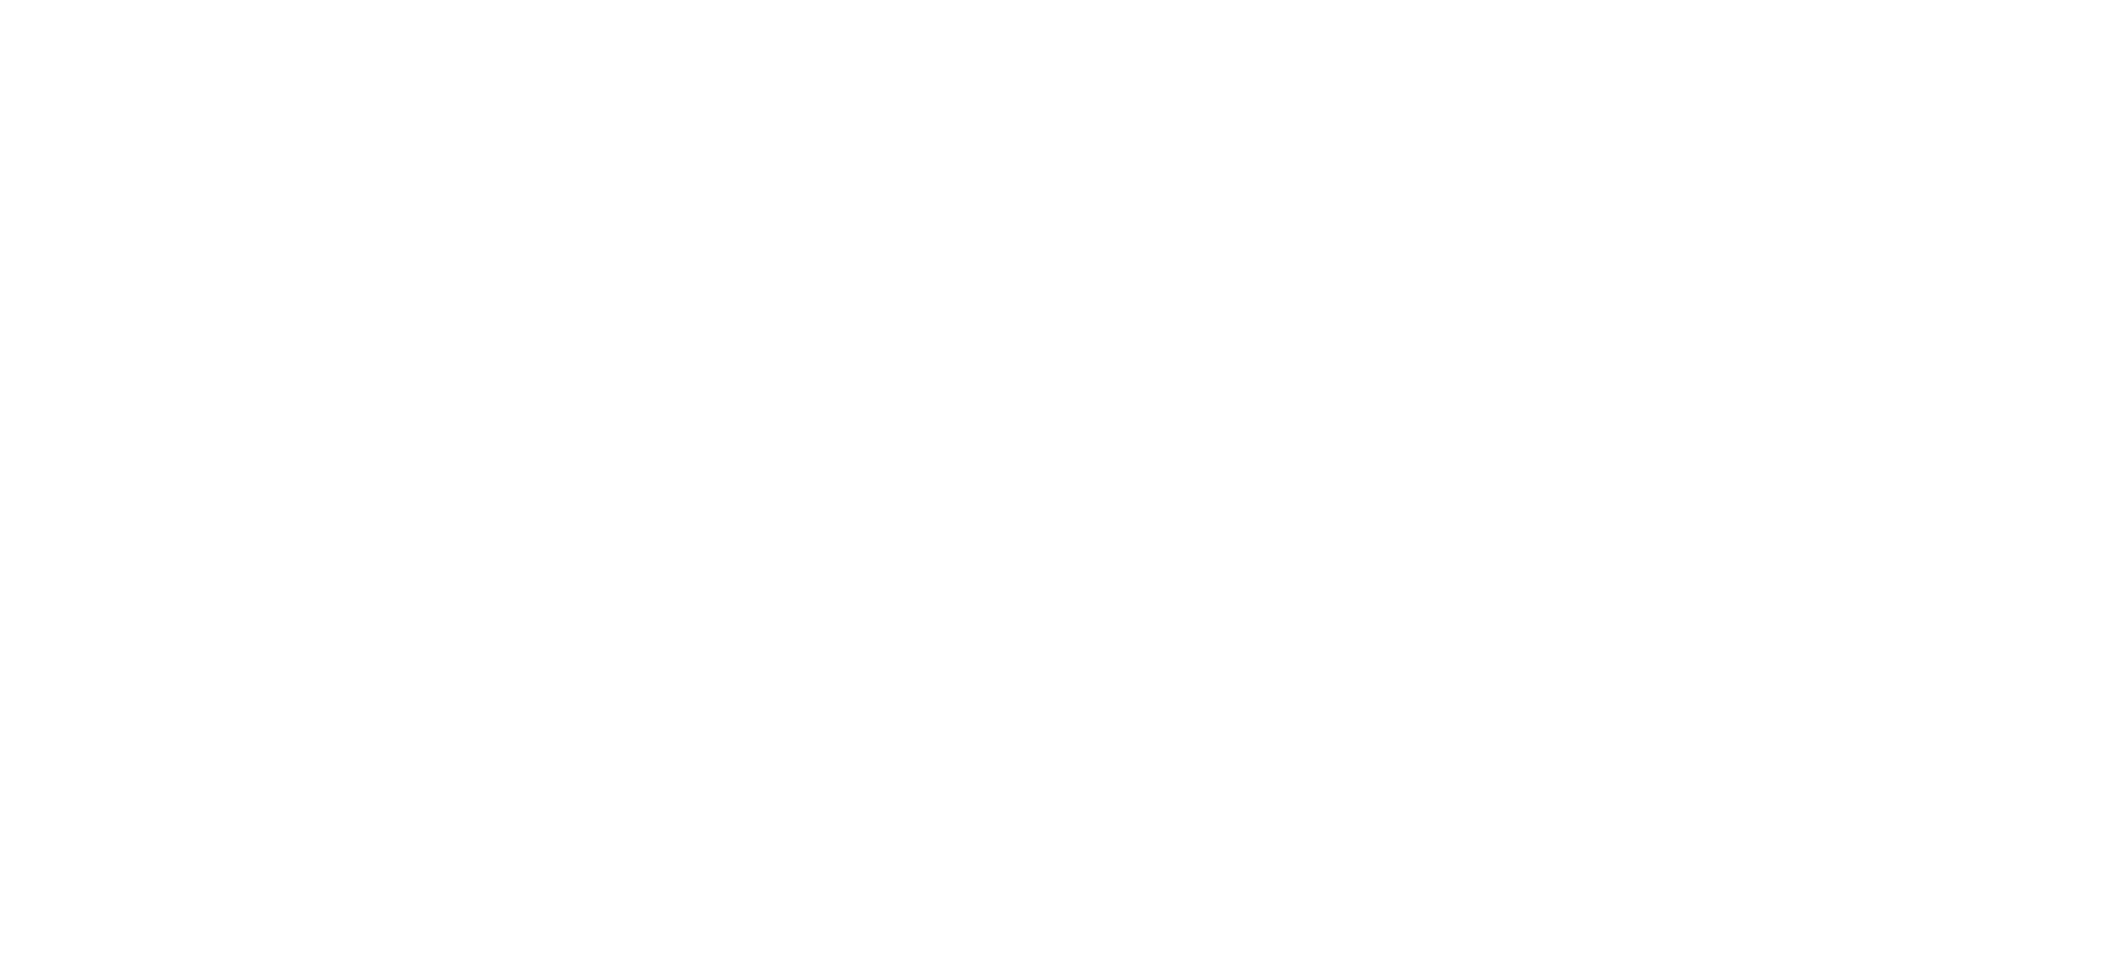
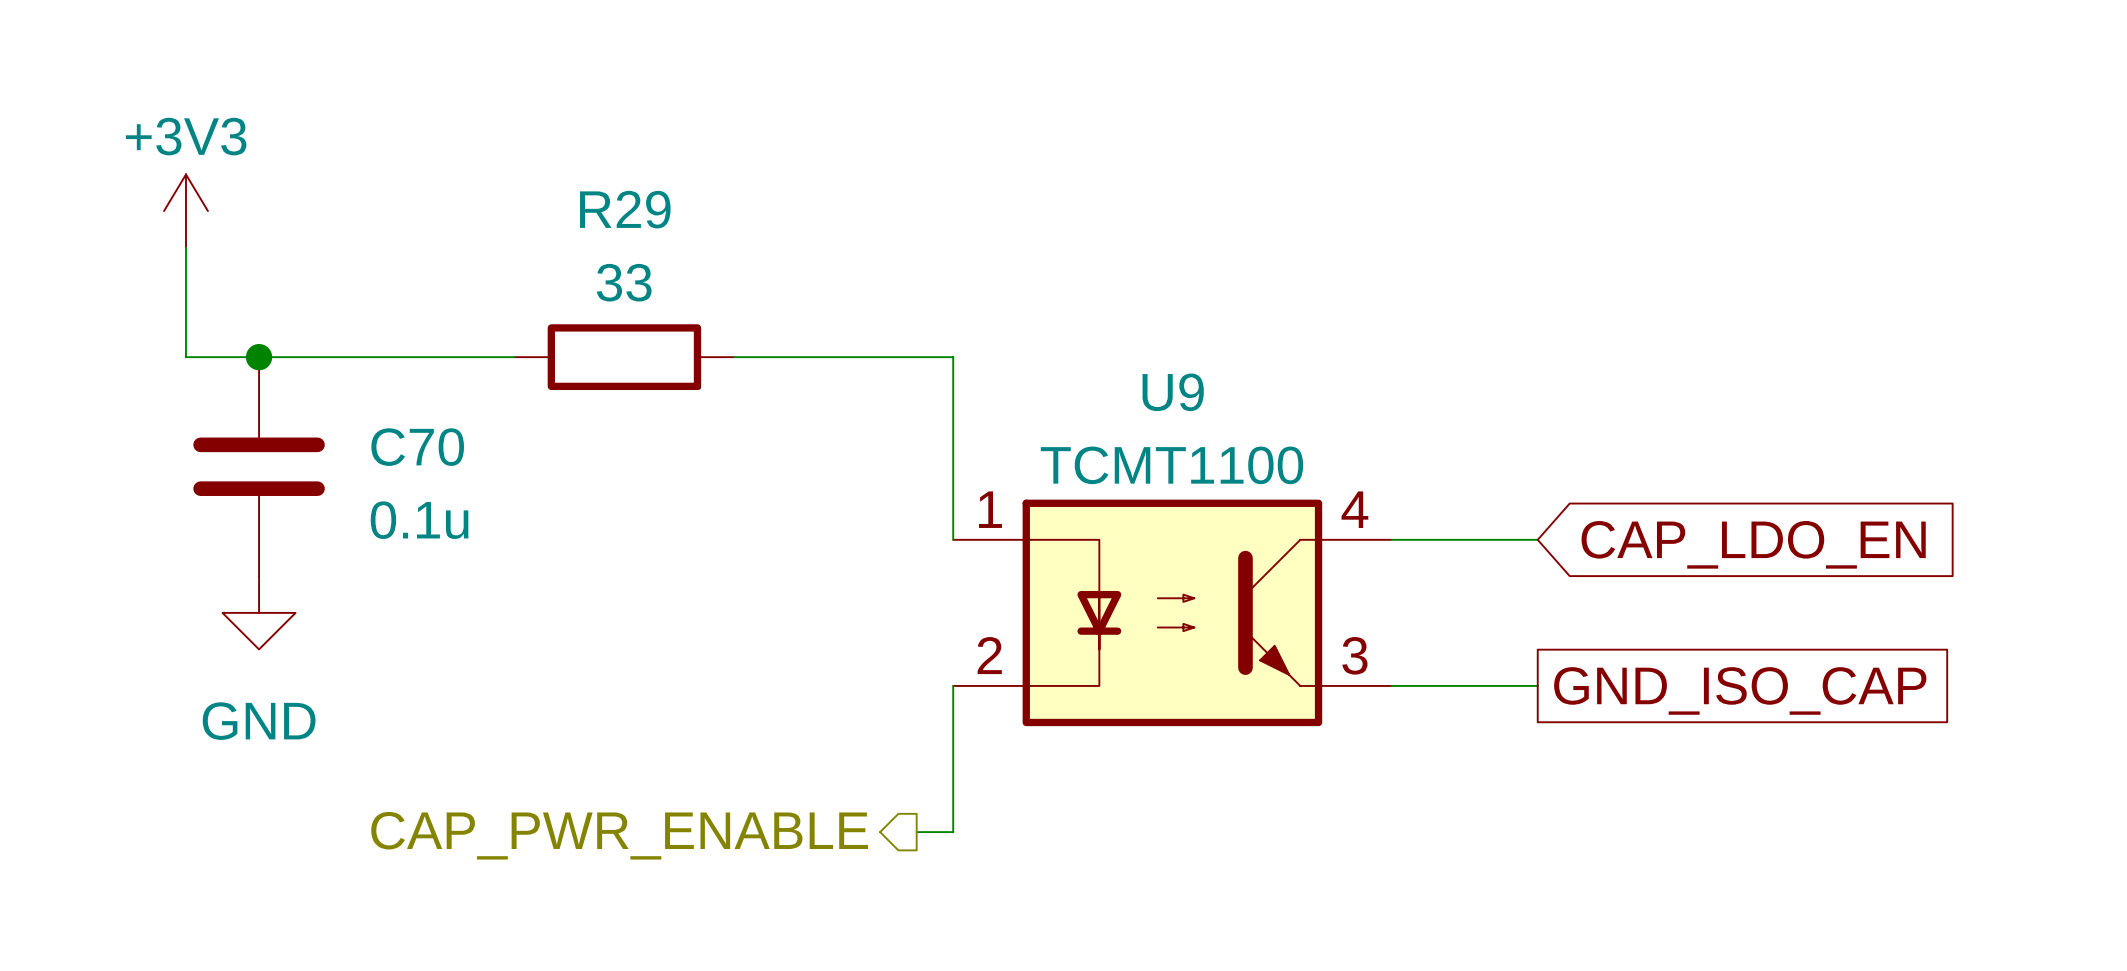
power symbol: none -> +3V3 (185, 211)
wire: none -> (185, 247) (185, 357) (514, 357)
junction: none -> (259, 357)
R29: none -> 33 (624, 357)
wire: none -> (734, 357) (953, 357) (953, 539)
C70: none -> 0.1u (259, 466)
wire: none -> (1391, 539) (1537, 539)
global label: none -> CAP_LDO_EN (1753, 544)
power symbol: none -> GND (259, 612)
U9: none -> TCMT1100 (1172, 612)
wire: none -> (953, 685) (953, 832) (916, 832)
wire: none -> (1391, 685) (1537, 685)
global label: none -> GND_ISO_CAP (1740, 690)
hierarchical label: none -> CAP_PWR_ENABLE (619, 835)

